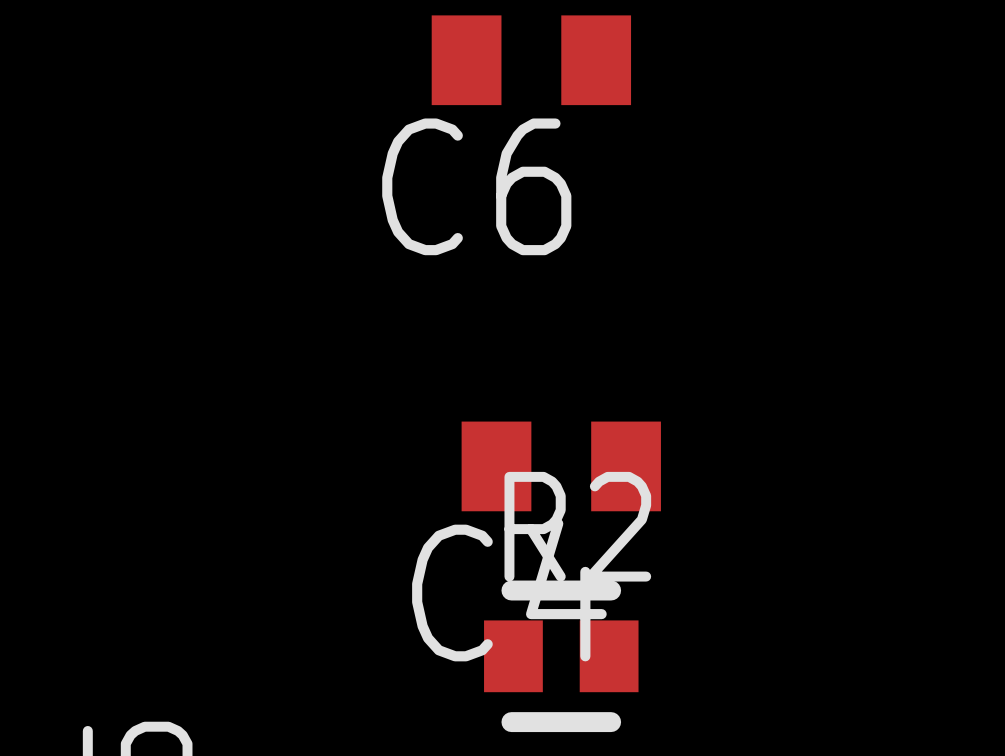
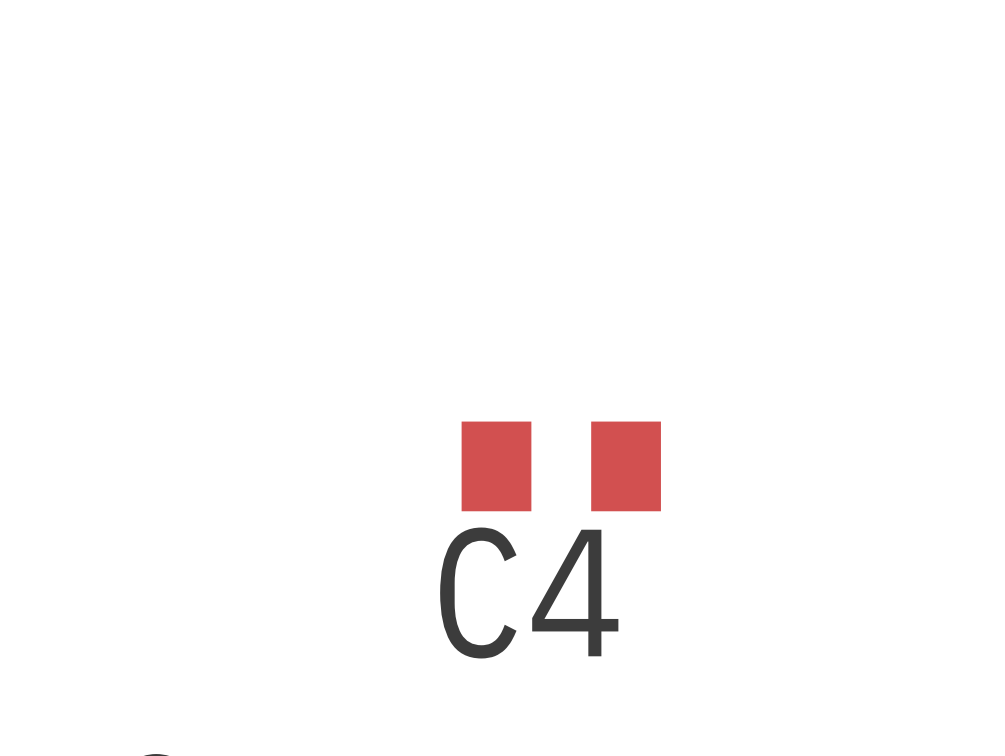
C6: (531, 60) -> none
R2: (561, 656) -> none

